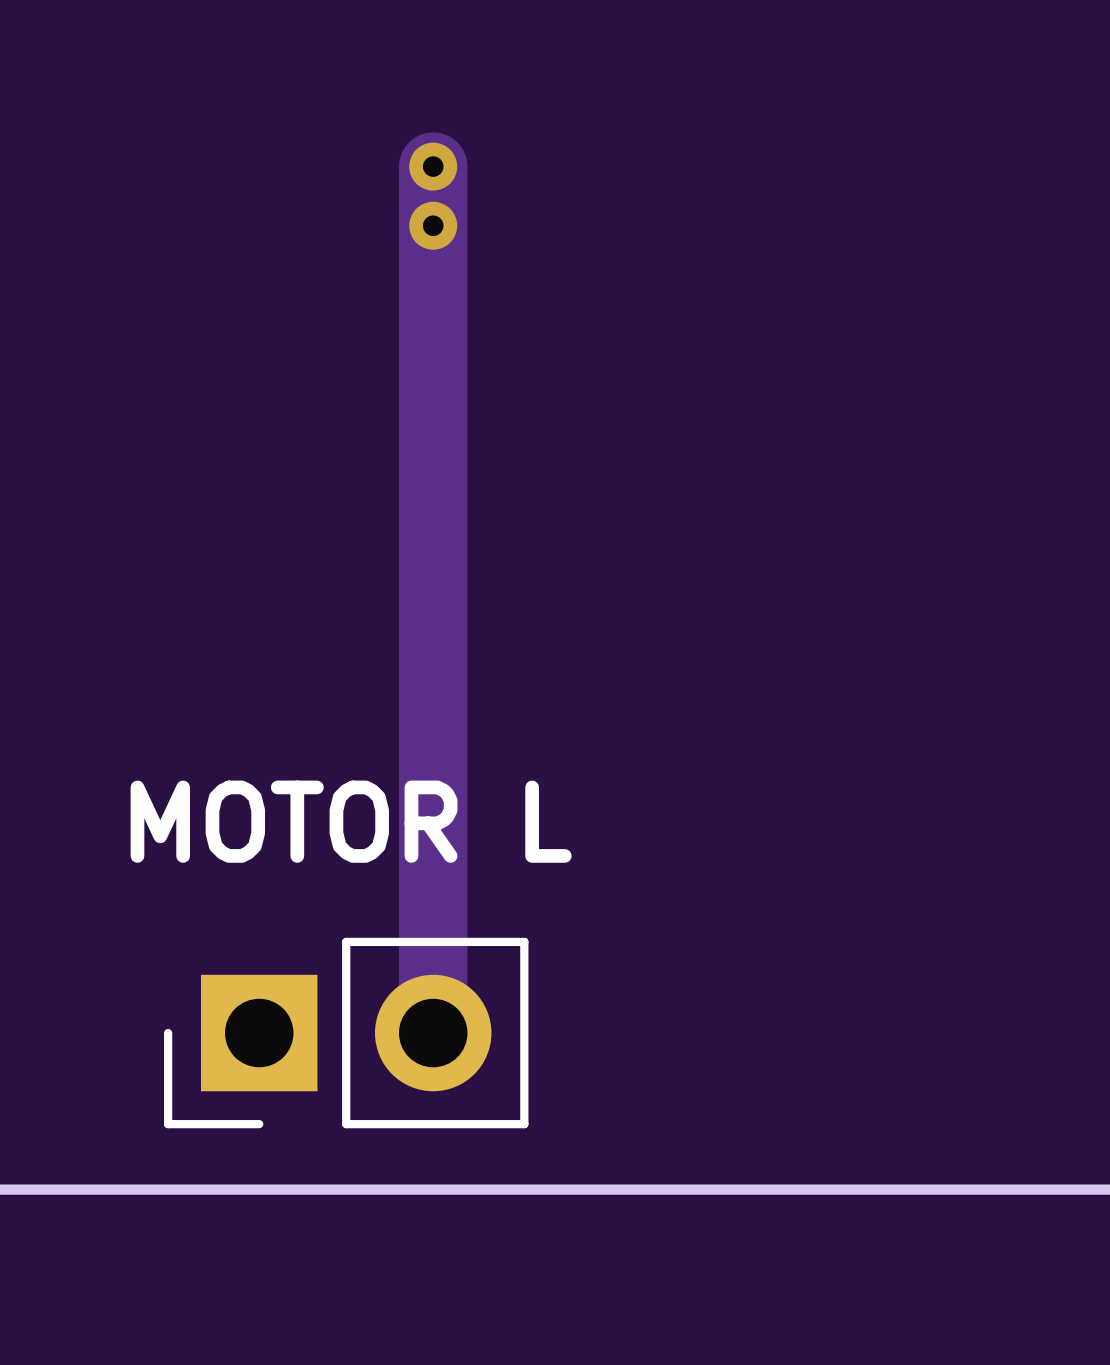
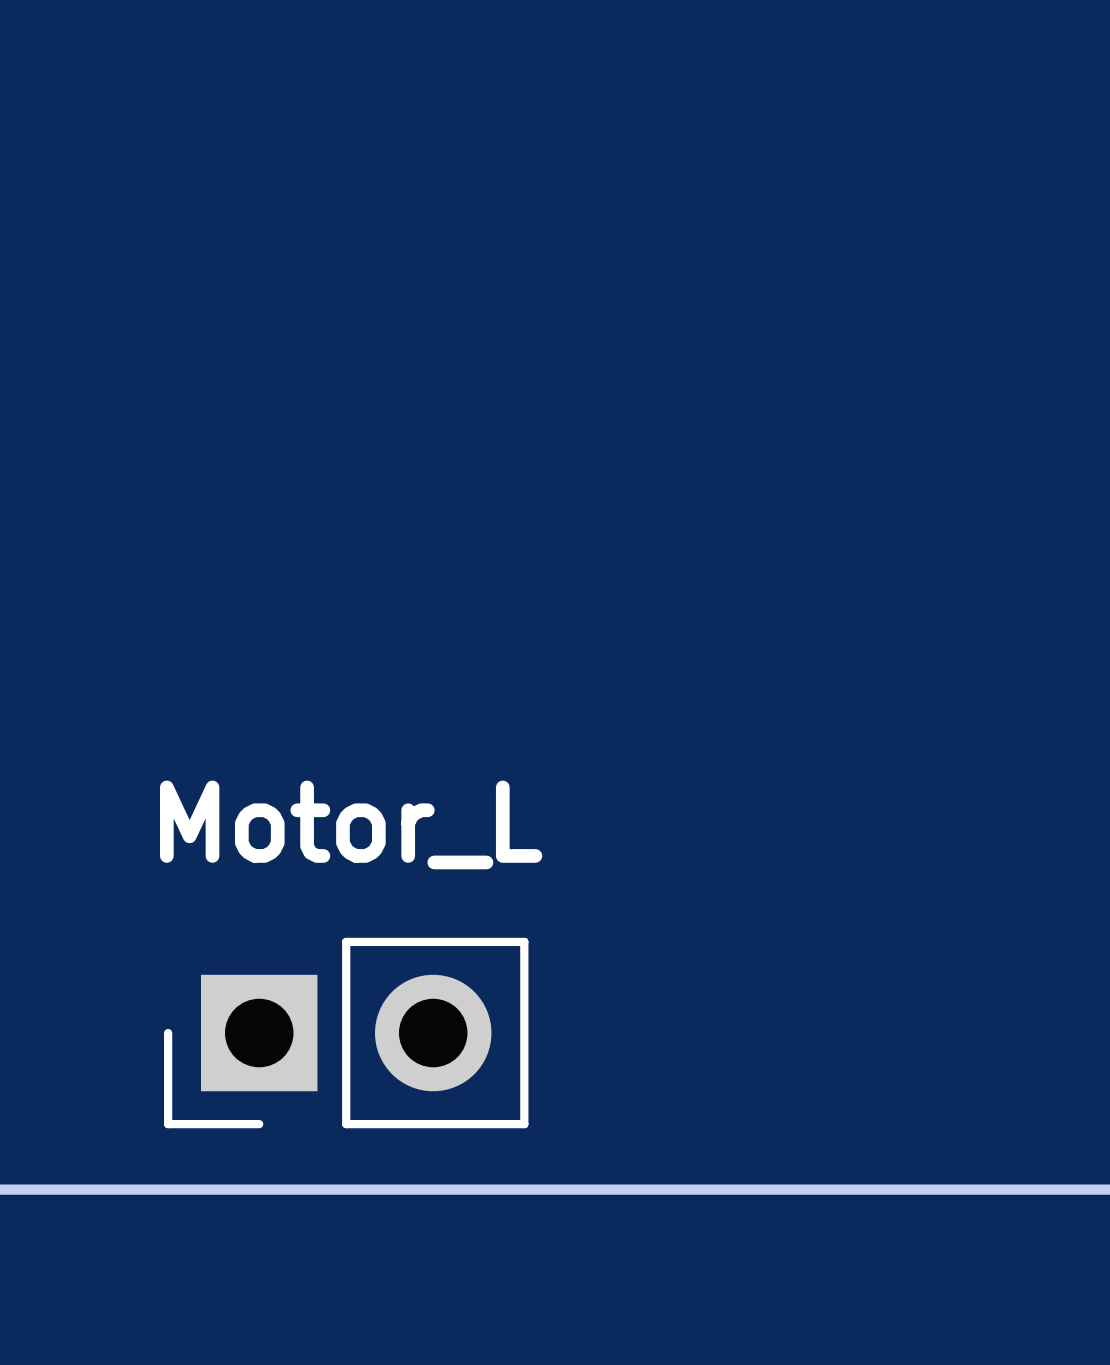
track: (433, 166) (433, 1033) -> none
via: (433, 166) -> none
via: (433, 225) -> none
MOTOR L name: MOTOR L (351, 821) -> Motor_L (351, 824)

